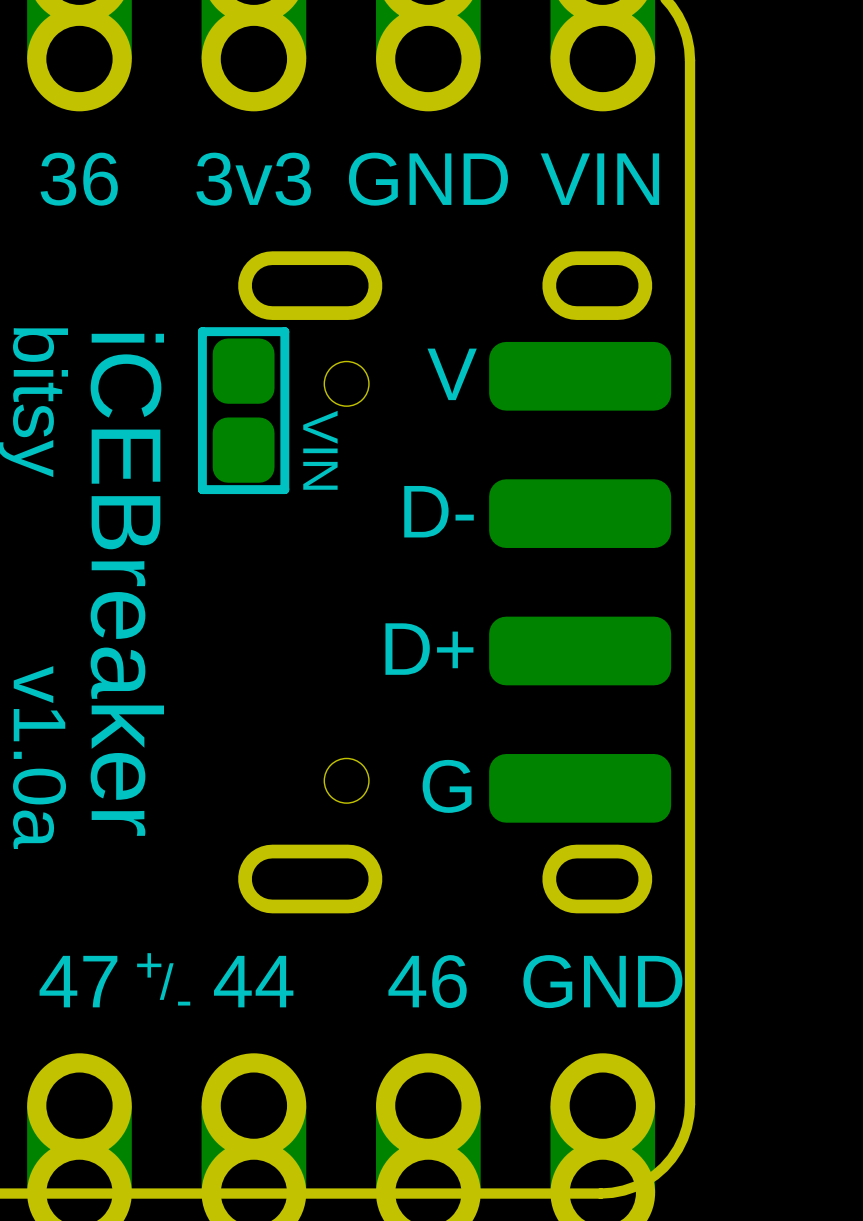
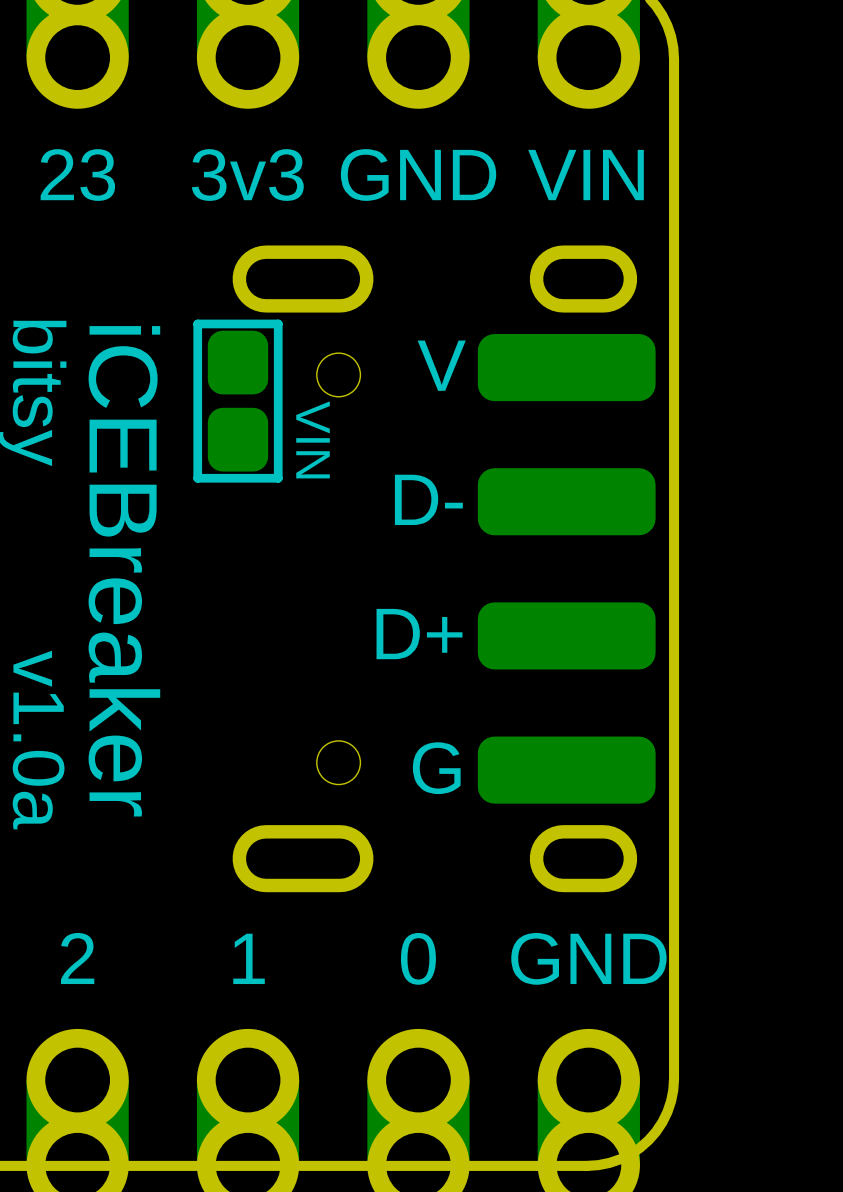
text: 36 (79, 179) -> 23 (77, 175)
text: + (149, 965) -> none
text: 47 (78, 981) -> 2 (77, 958)
text: / (166, 981) -> none
text: 44 (253, 981) -> 1 (249, 958)
text: 46 (427, 981) -> 0 (418, 958)
text: - (184, 1003) -> none

